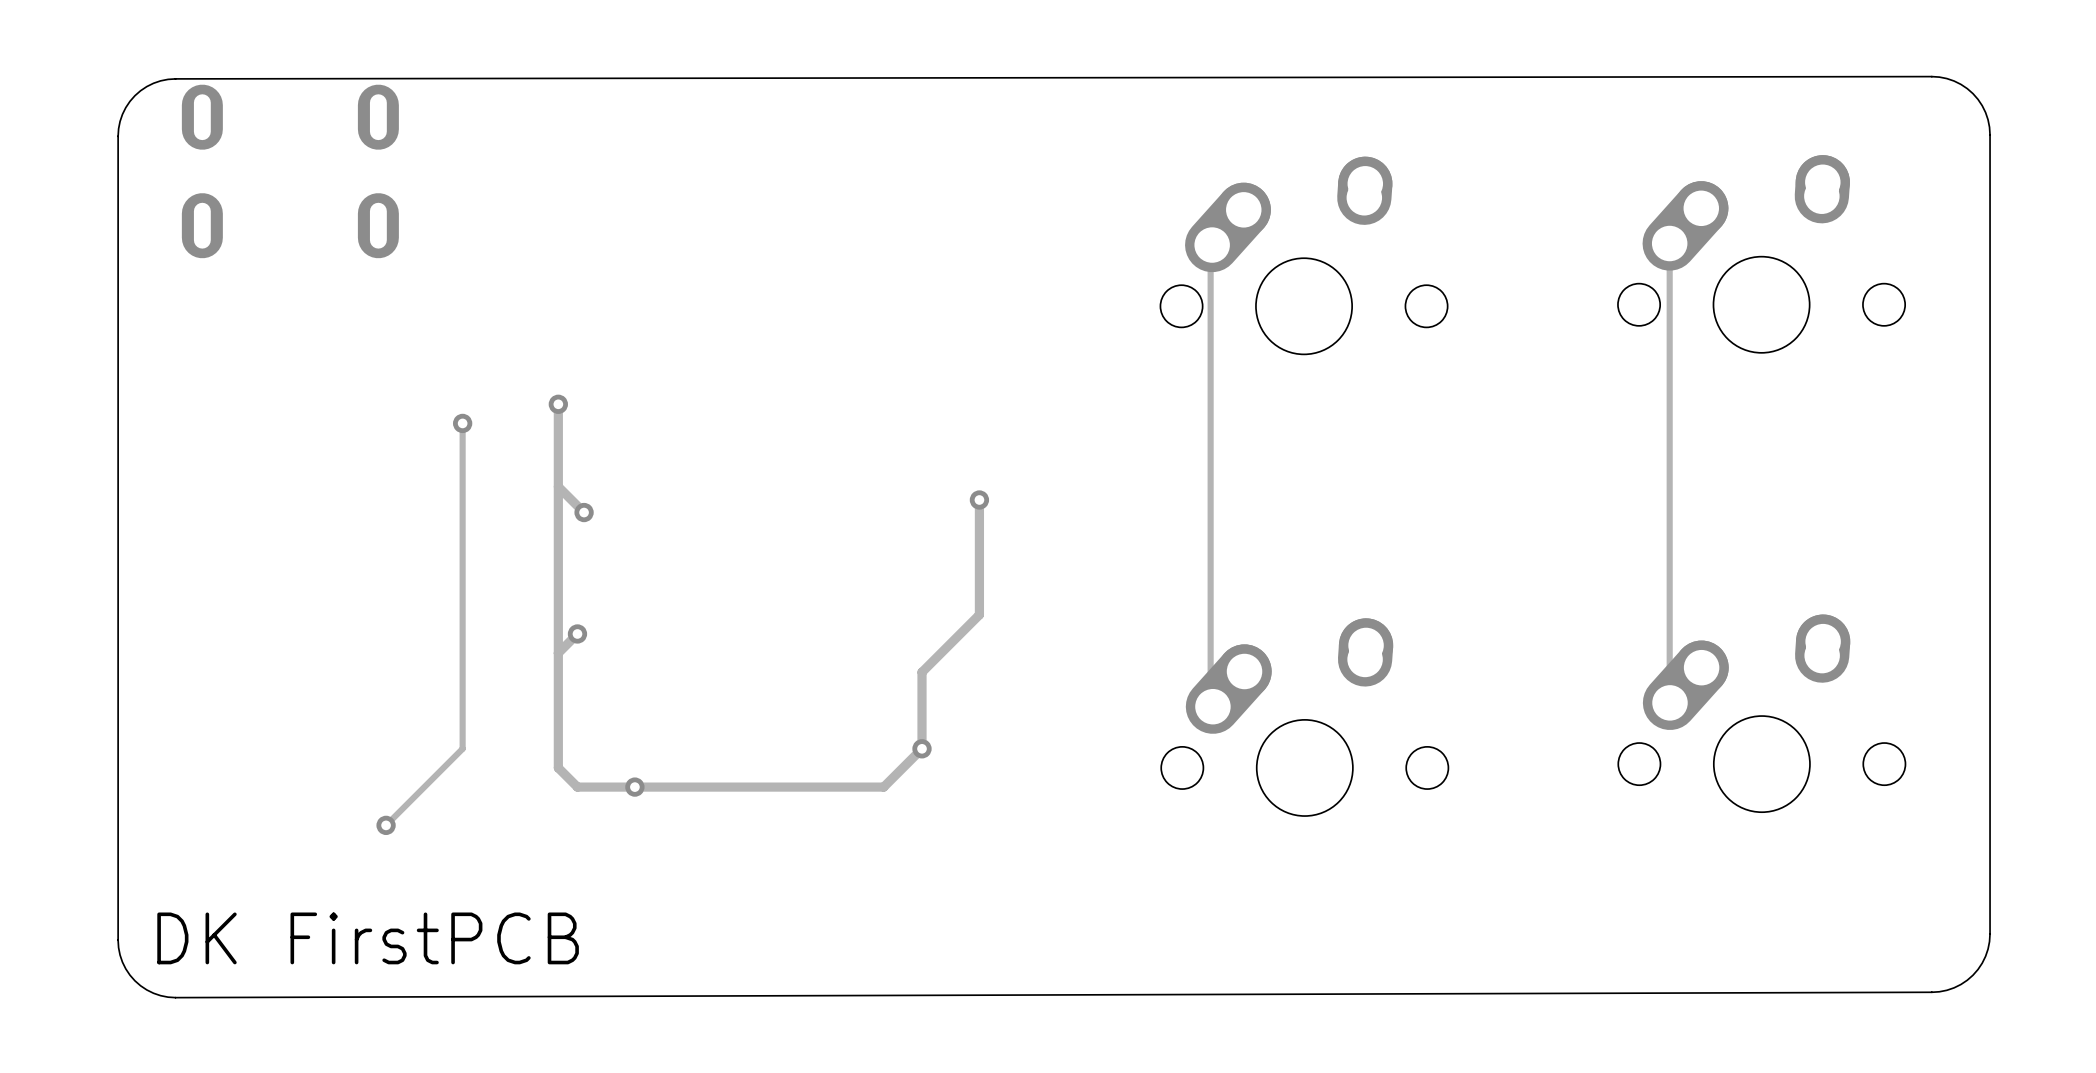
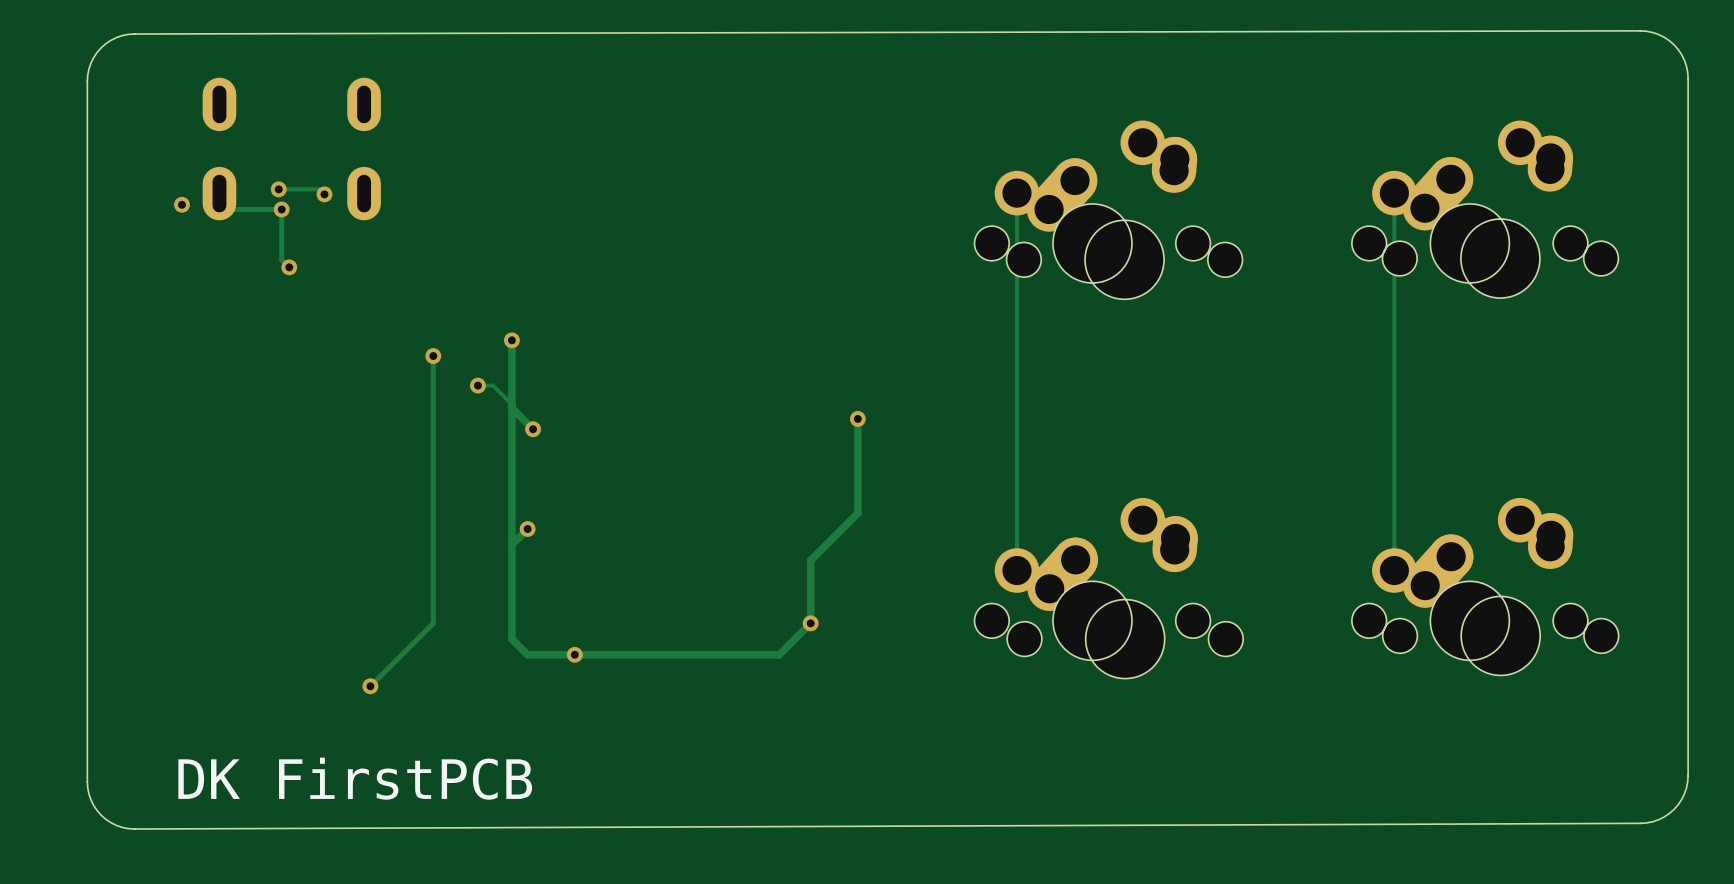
board edge: (1990, 134) (1985, 112) (1972, 93) (1954, 81) (1931, 76) (175, 78) (160, 80) (140, 90) (125, 107) (118, 128) (118, 940) (120, 955) (125, 968) (140, 985) (153, 993) (175, 997) (1931, 992) -> (1688, 118) (1687, 72) (1681, 54) (1674, 44) (1664, 37) (1652, 32) (1640, 30) (134, 34) (116, 37) (105, 43) (93, 57) (87, 75) (87, 781) (88, 794) (93, 805) (105, 819) (116, 825) (134, 829) (1640, 823)
track: none -> (278, 189) (319, 189) (324, 194)
via: none -> (278, 189)
via: none -> (324, 194)
part: none -> (1092, 201)
part: none -> (1469, 201)
via: none -> (181, 204)
track: (1210, 243) (1210, 702) -> (1016, 193) (1016, 570)
track: (1669, 243) (1669, 702) -> (1394, 193) (1394, 570)
via: none -> (281, 209)
track: none -> (224, 210) (281, 209) (281, 259) (289, 267)
via: none -> (289, 267)
track: none -> (477, 385) (493, 385) (511, 404)
via: none -> (477, 385)
part: none -> (1092, 579)
part: none -> (1469, 579)

